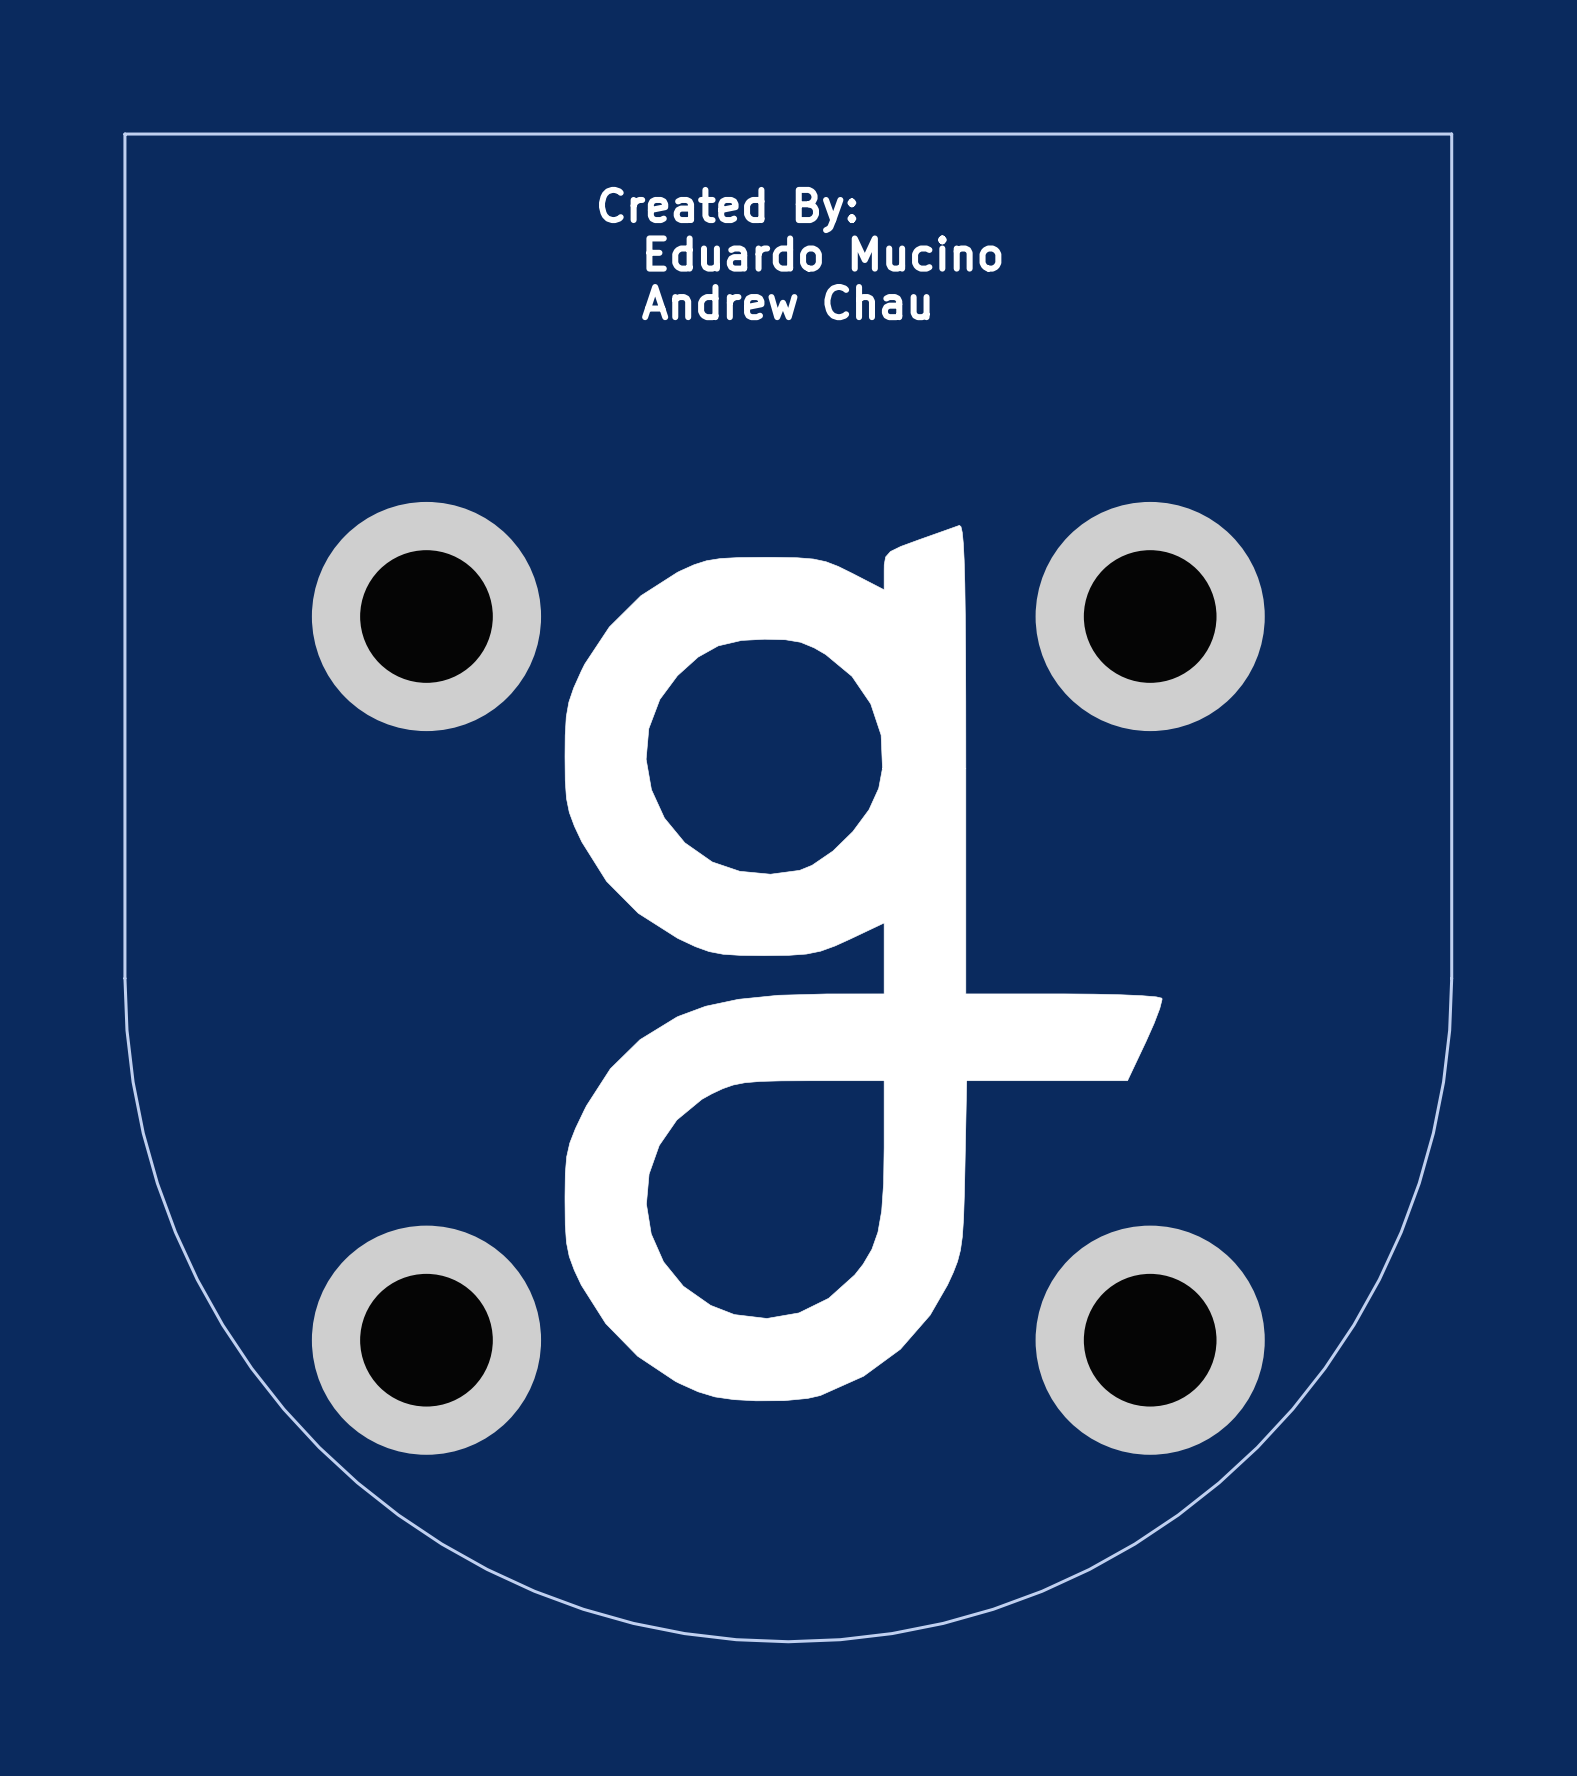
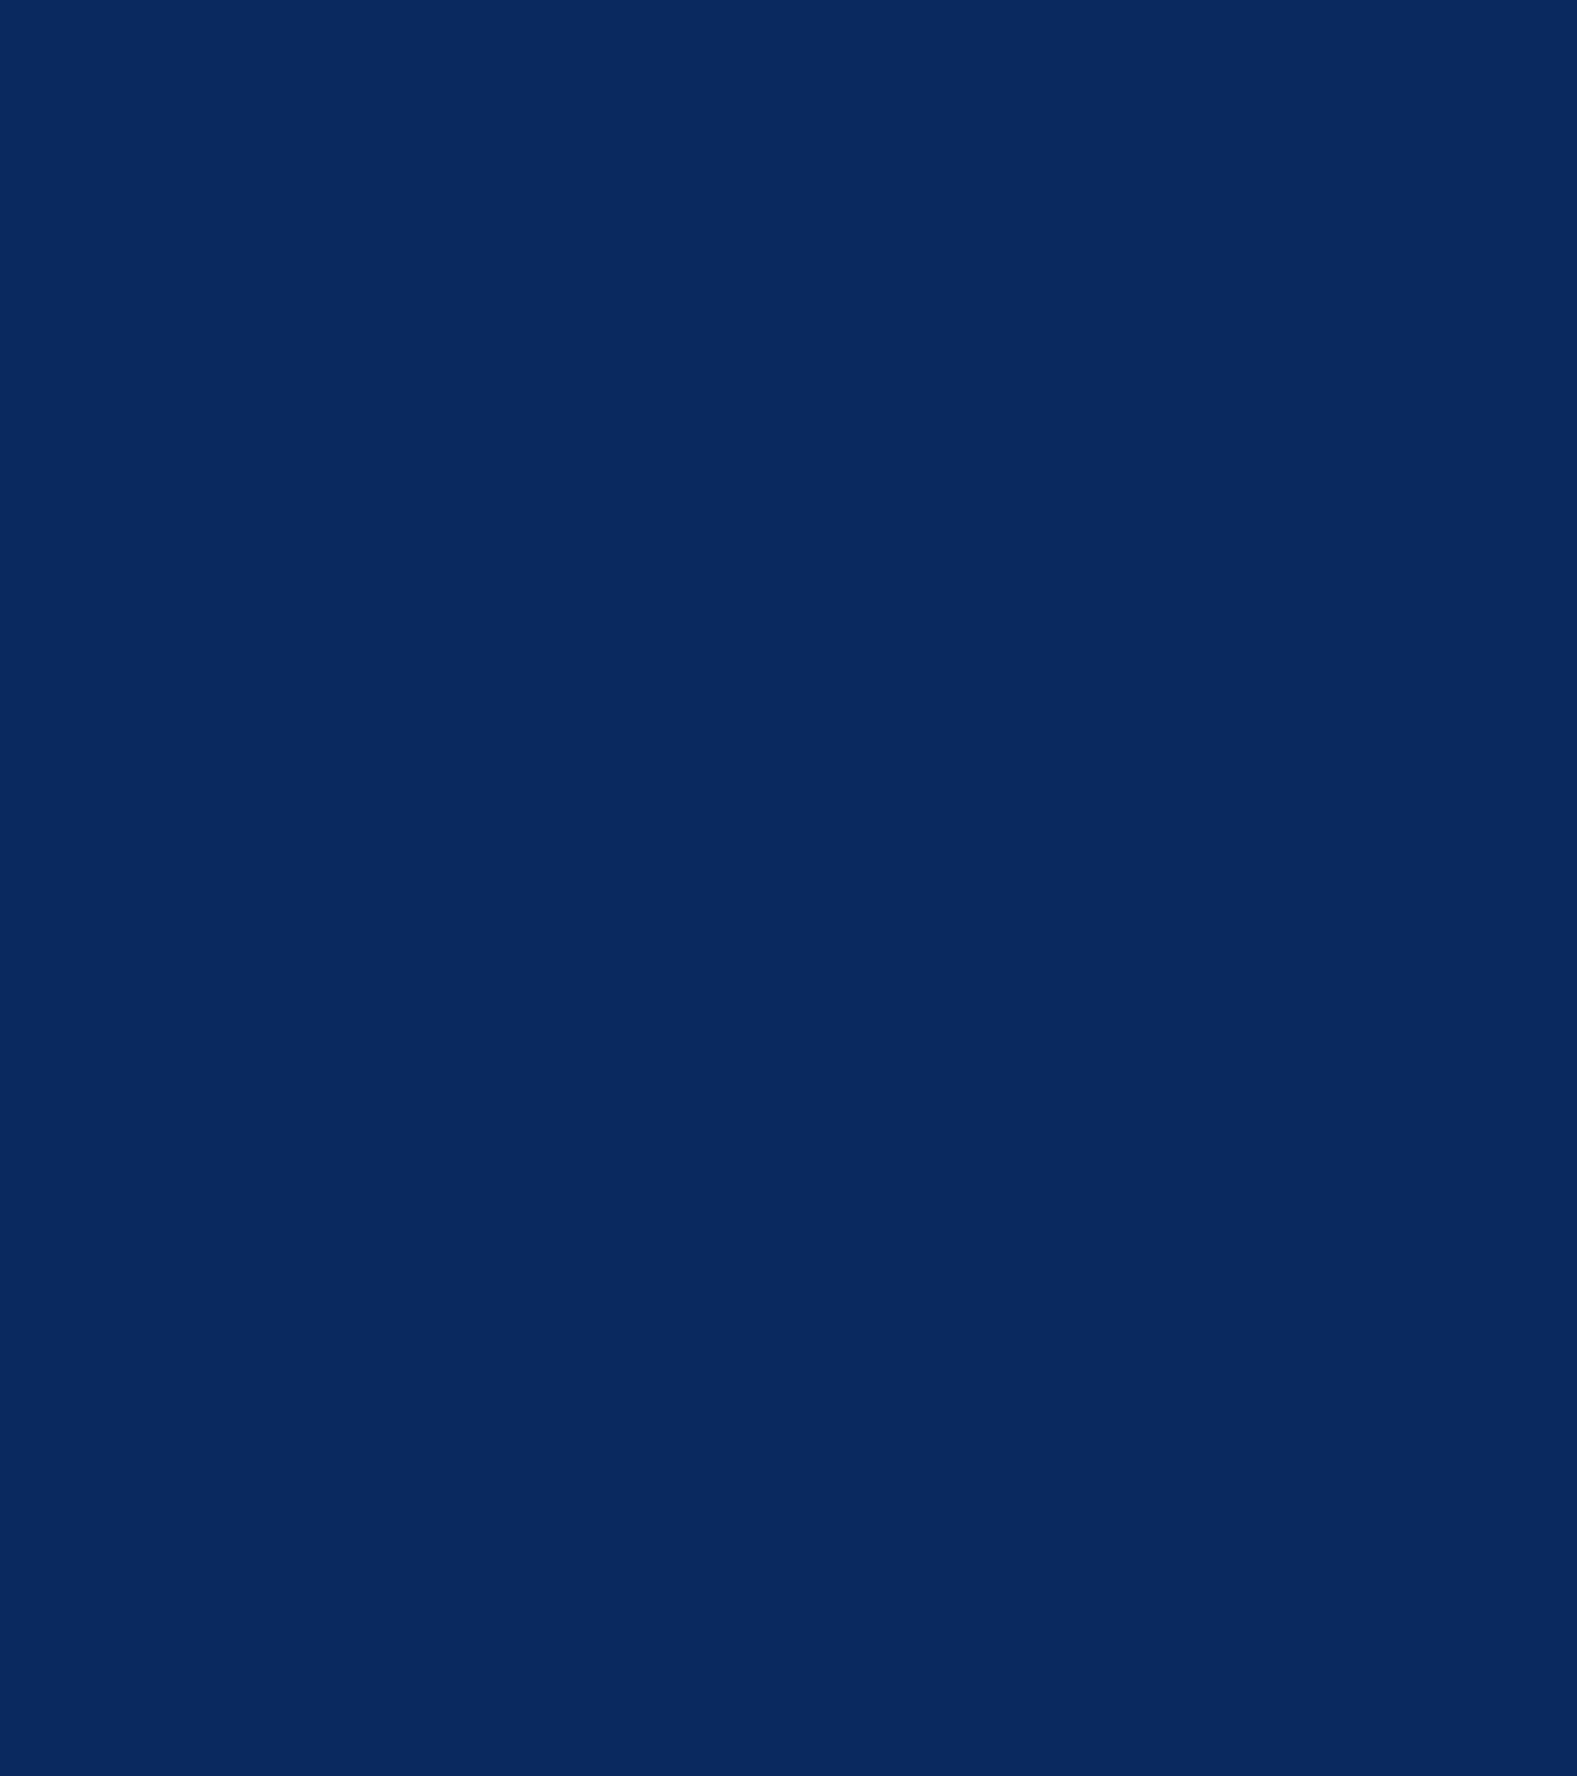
board edge: (1451, 134) (1451, 978) (1449, 1030) (1443, 1082) (1433, 1133) (1419, 1183) (1401, 1232) (1379, 1279) (1353, 1324) (1325, 1368) (1292, 1409) (1257, 1447) (1219, 1482) (1178, 1515) (1134, 1543) (1089, 1569) (1042, 1591) (993, 1609) (943, 1623) (892, 1633) (840, 1639) (788, 1641) (736, 1639) (684, 1633) (633, 1623) (583, 1609) (534, 1591) (487, 1569) (441, 1543) (398, 1515) (357, 1482) (319, 1447) (283, 1409) (251, 1368) (222, 1324) (197, 1279) (175, 1232) (157, 1183) (143, 1133) (133, 1082) (126, 1030) (124, 978) (124, 134) (1451, 134) -> none
text: Created By: (727, 210) -> none
text: Eduardo Mucino (823, 253) -> none
text: Andrew Chau (785, 302) -> none
drawing: [564, 525, 1163, 1402] -> none
part: (426, 616) -> none
part: (1150, 616) -> none
part: (426, 1340) -> none
part: (1150, 1340) -> none

